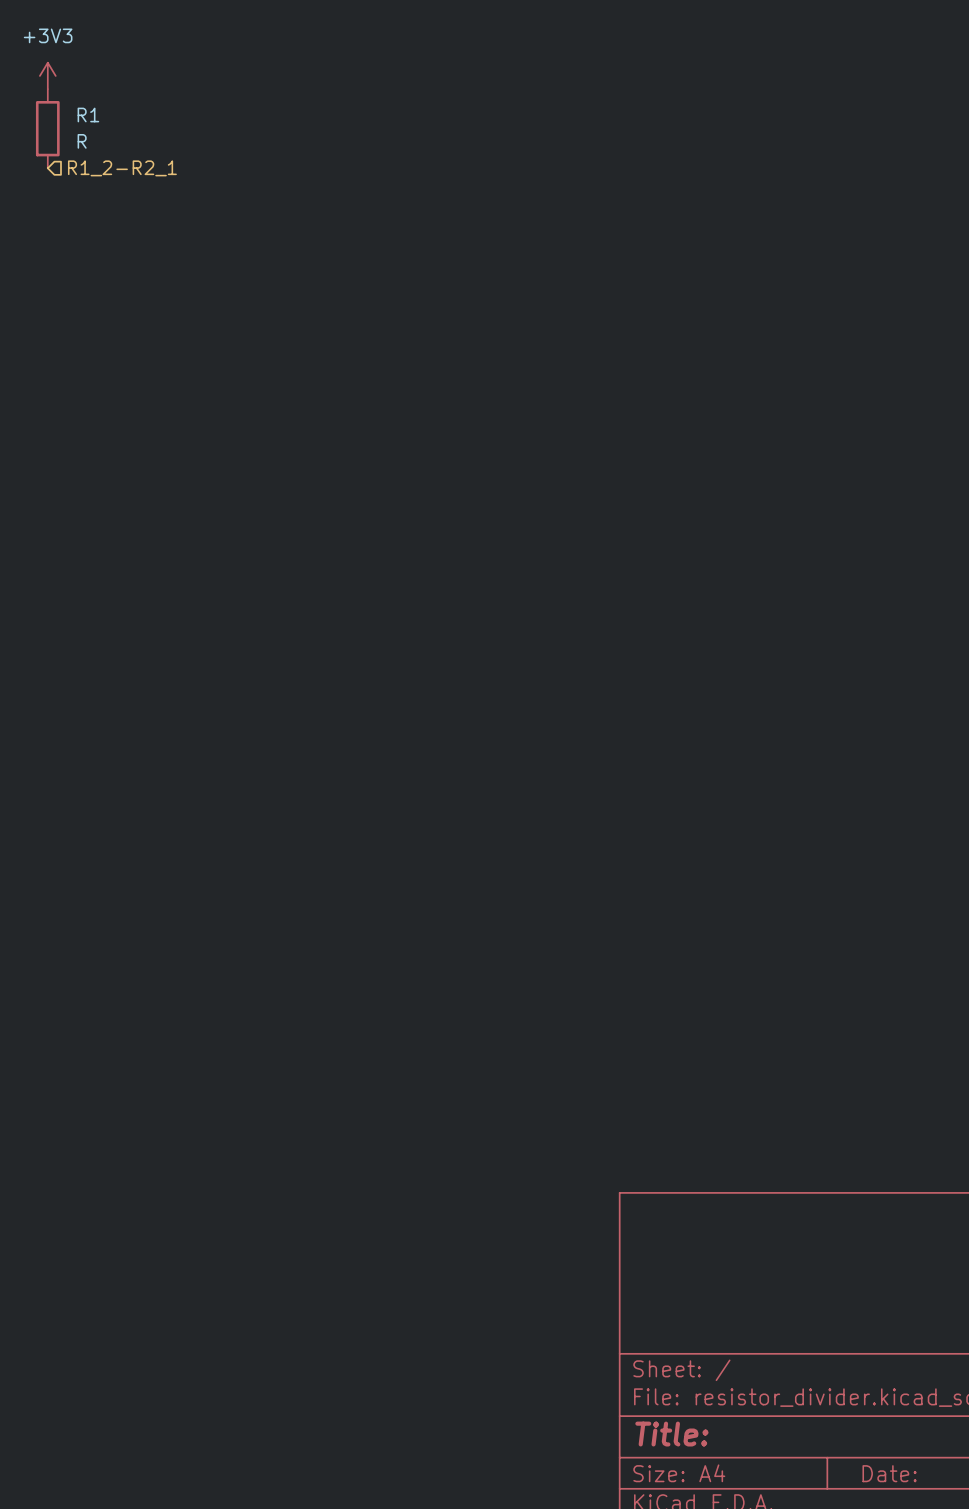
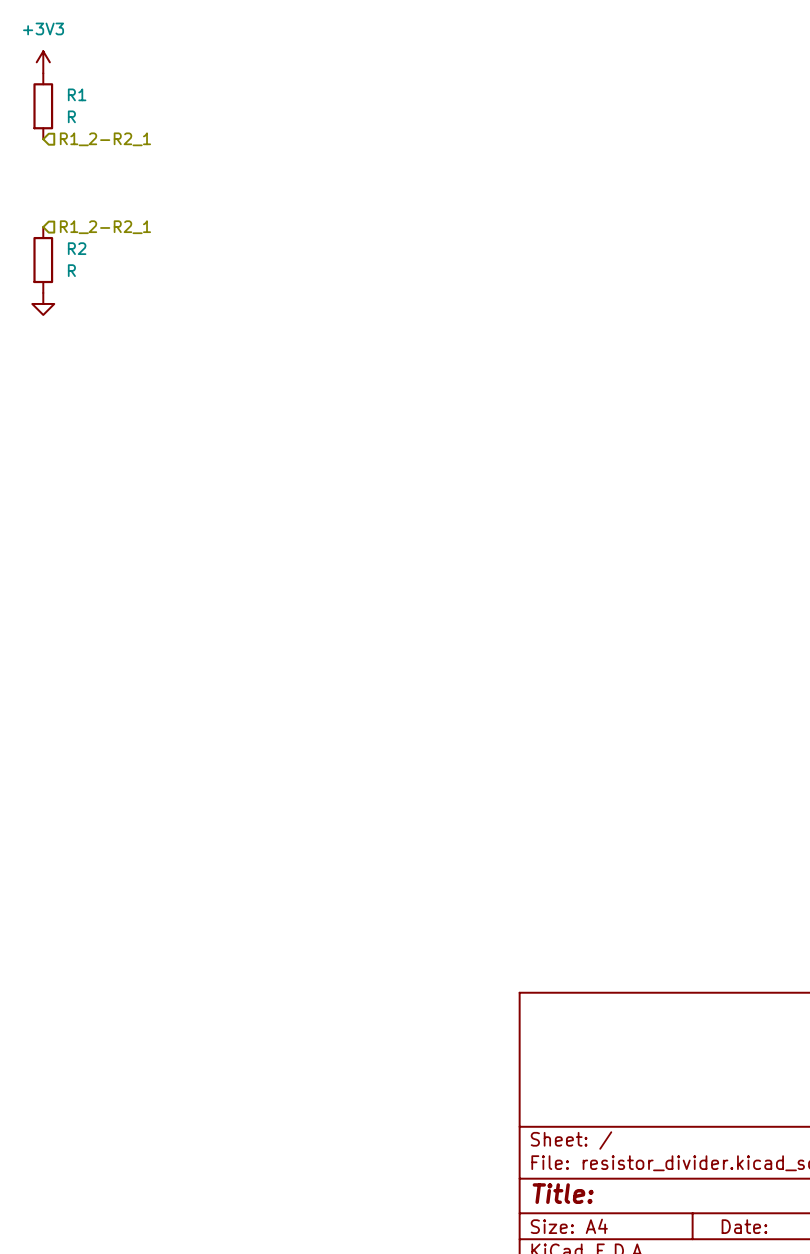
hierarchical label: none -> R1_2-R2_1 (105, 227)
R2: none -> R (43, 260)
power symbol: none -> (43, 303)

